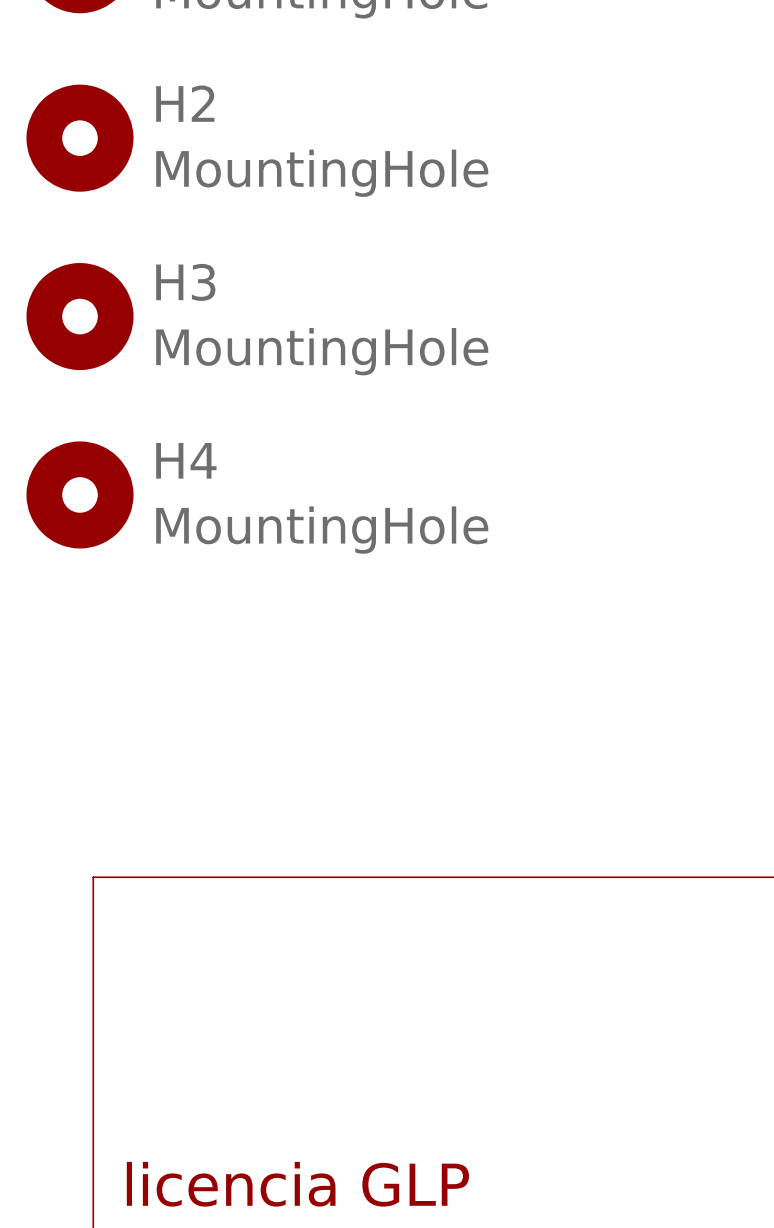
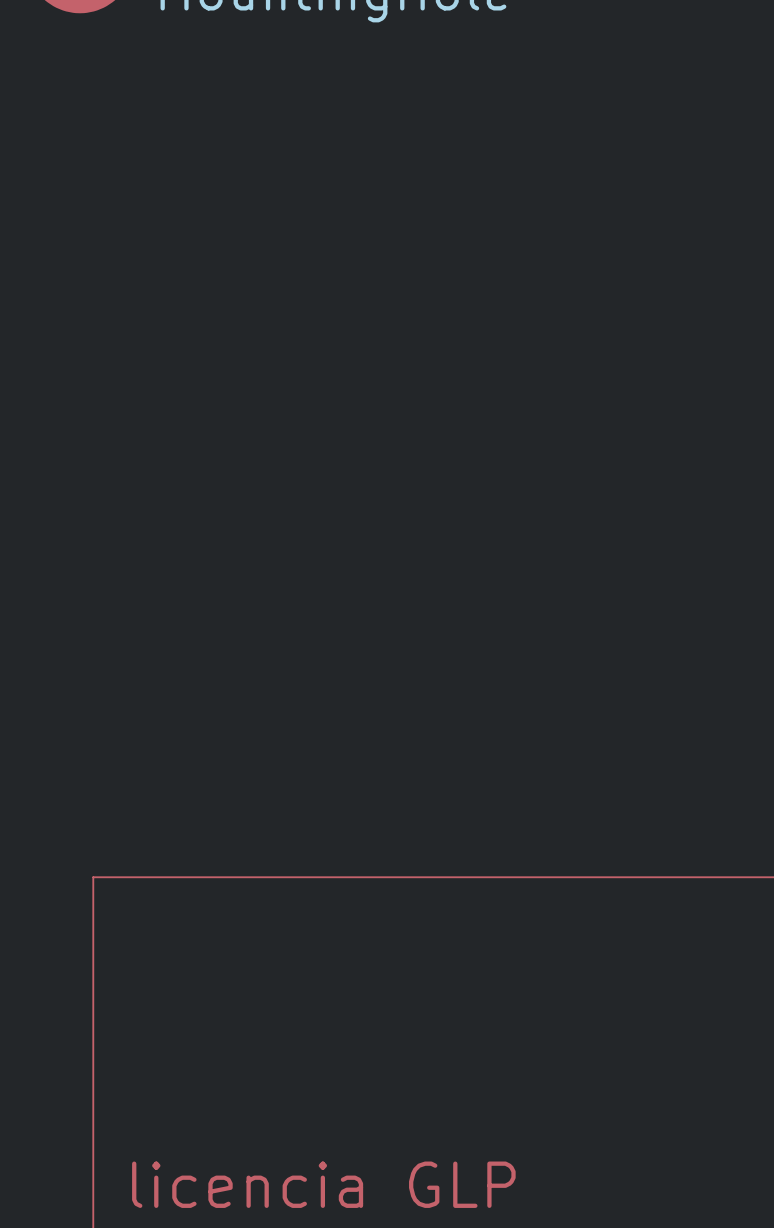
H2: MountingHole (80, 138) -> none
H3: MountingHole (80, 316) -> none
H4: MountingHole (80, 494) -> none

